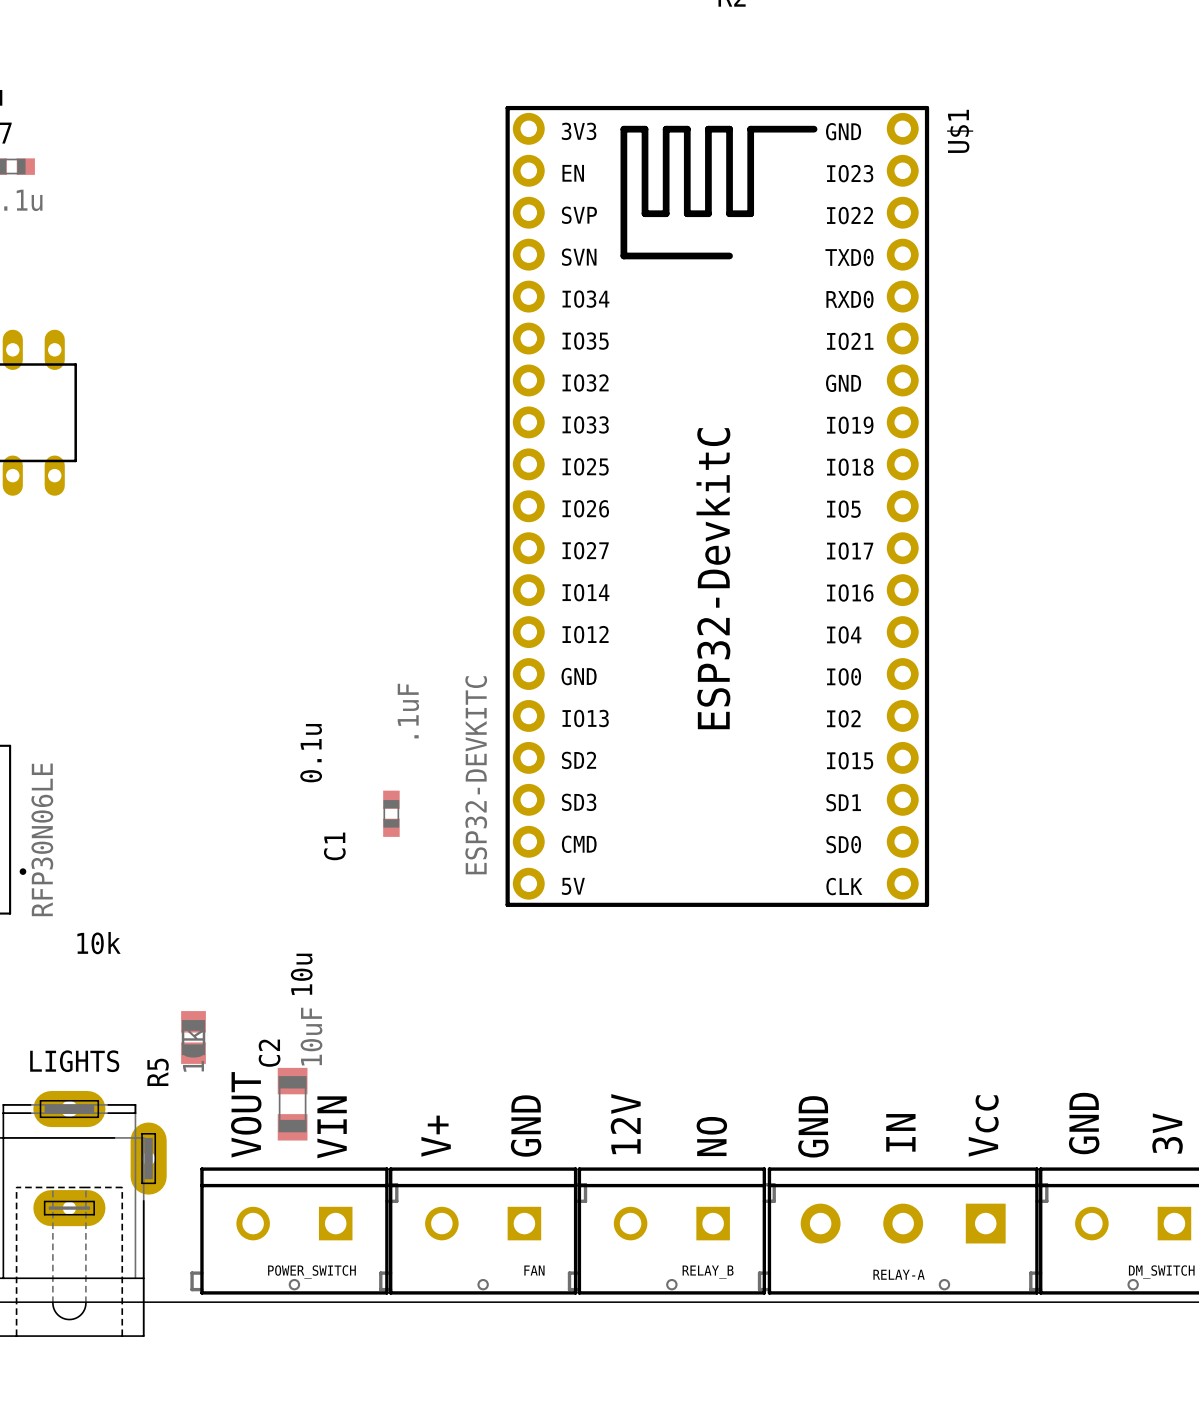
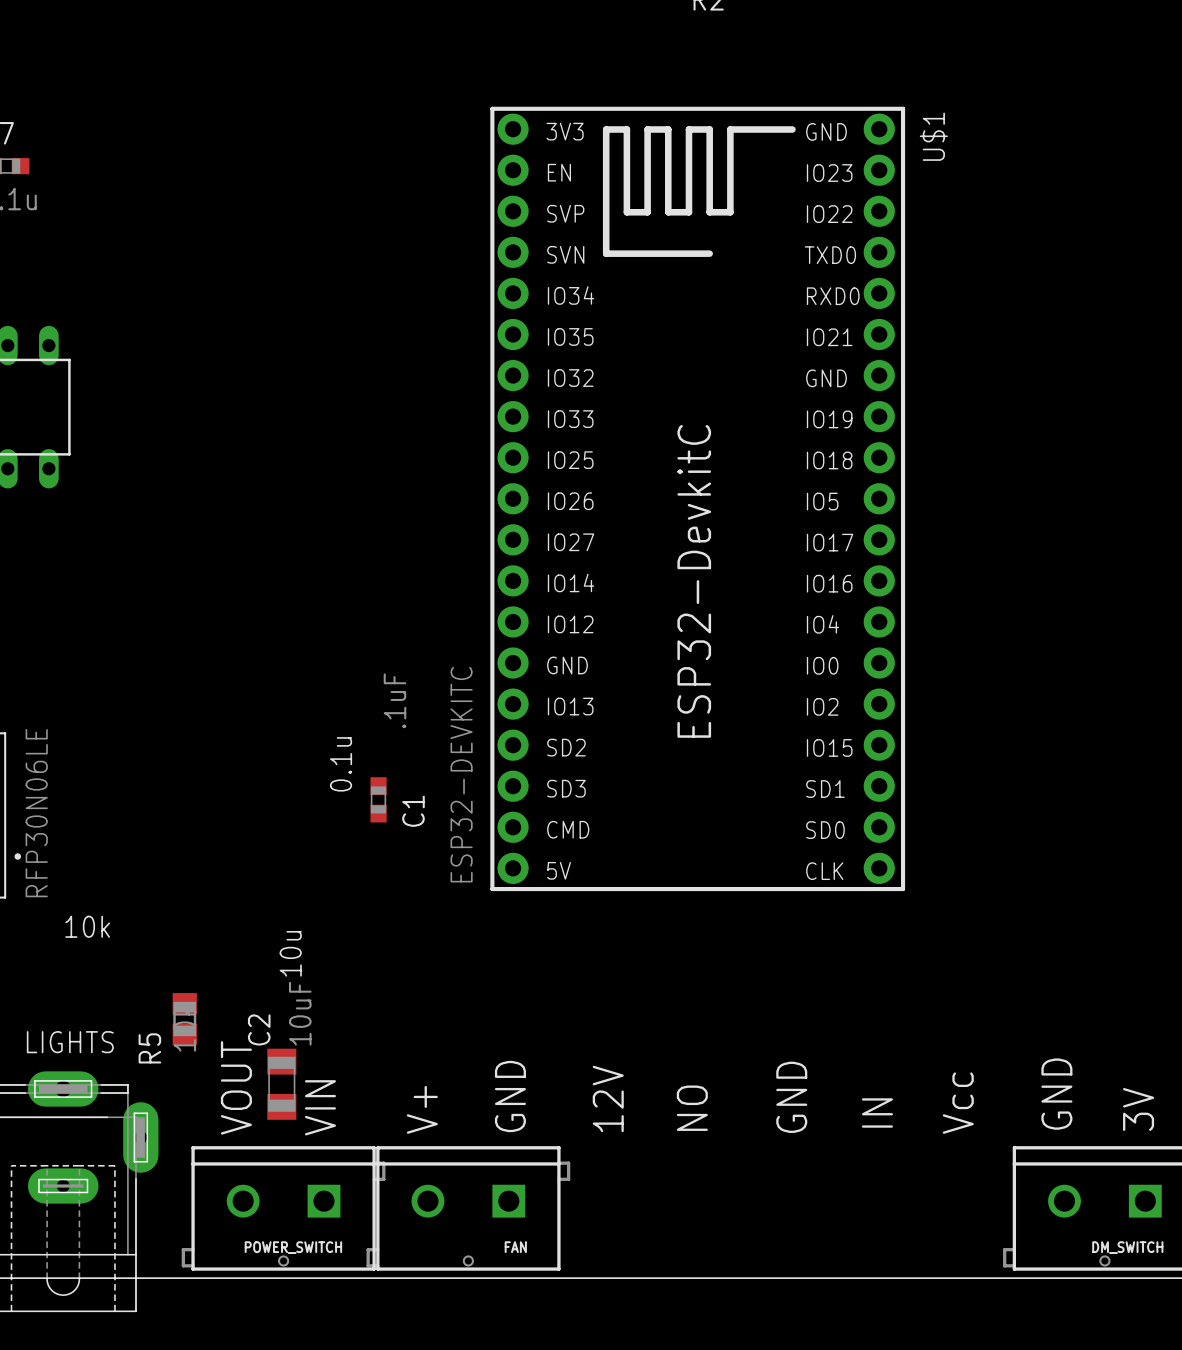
text position: 0.1u (311, 753) -> 0.1u (341, 764)
C1 name position: C1 (334, 846) -> C1 (413, 811)
RELAY_B: (671, 1231) -> none
RELAY-A: (903, 1231) -> none

